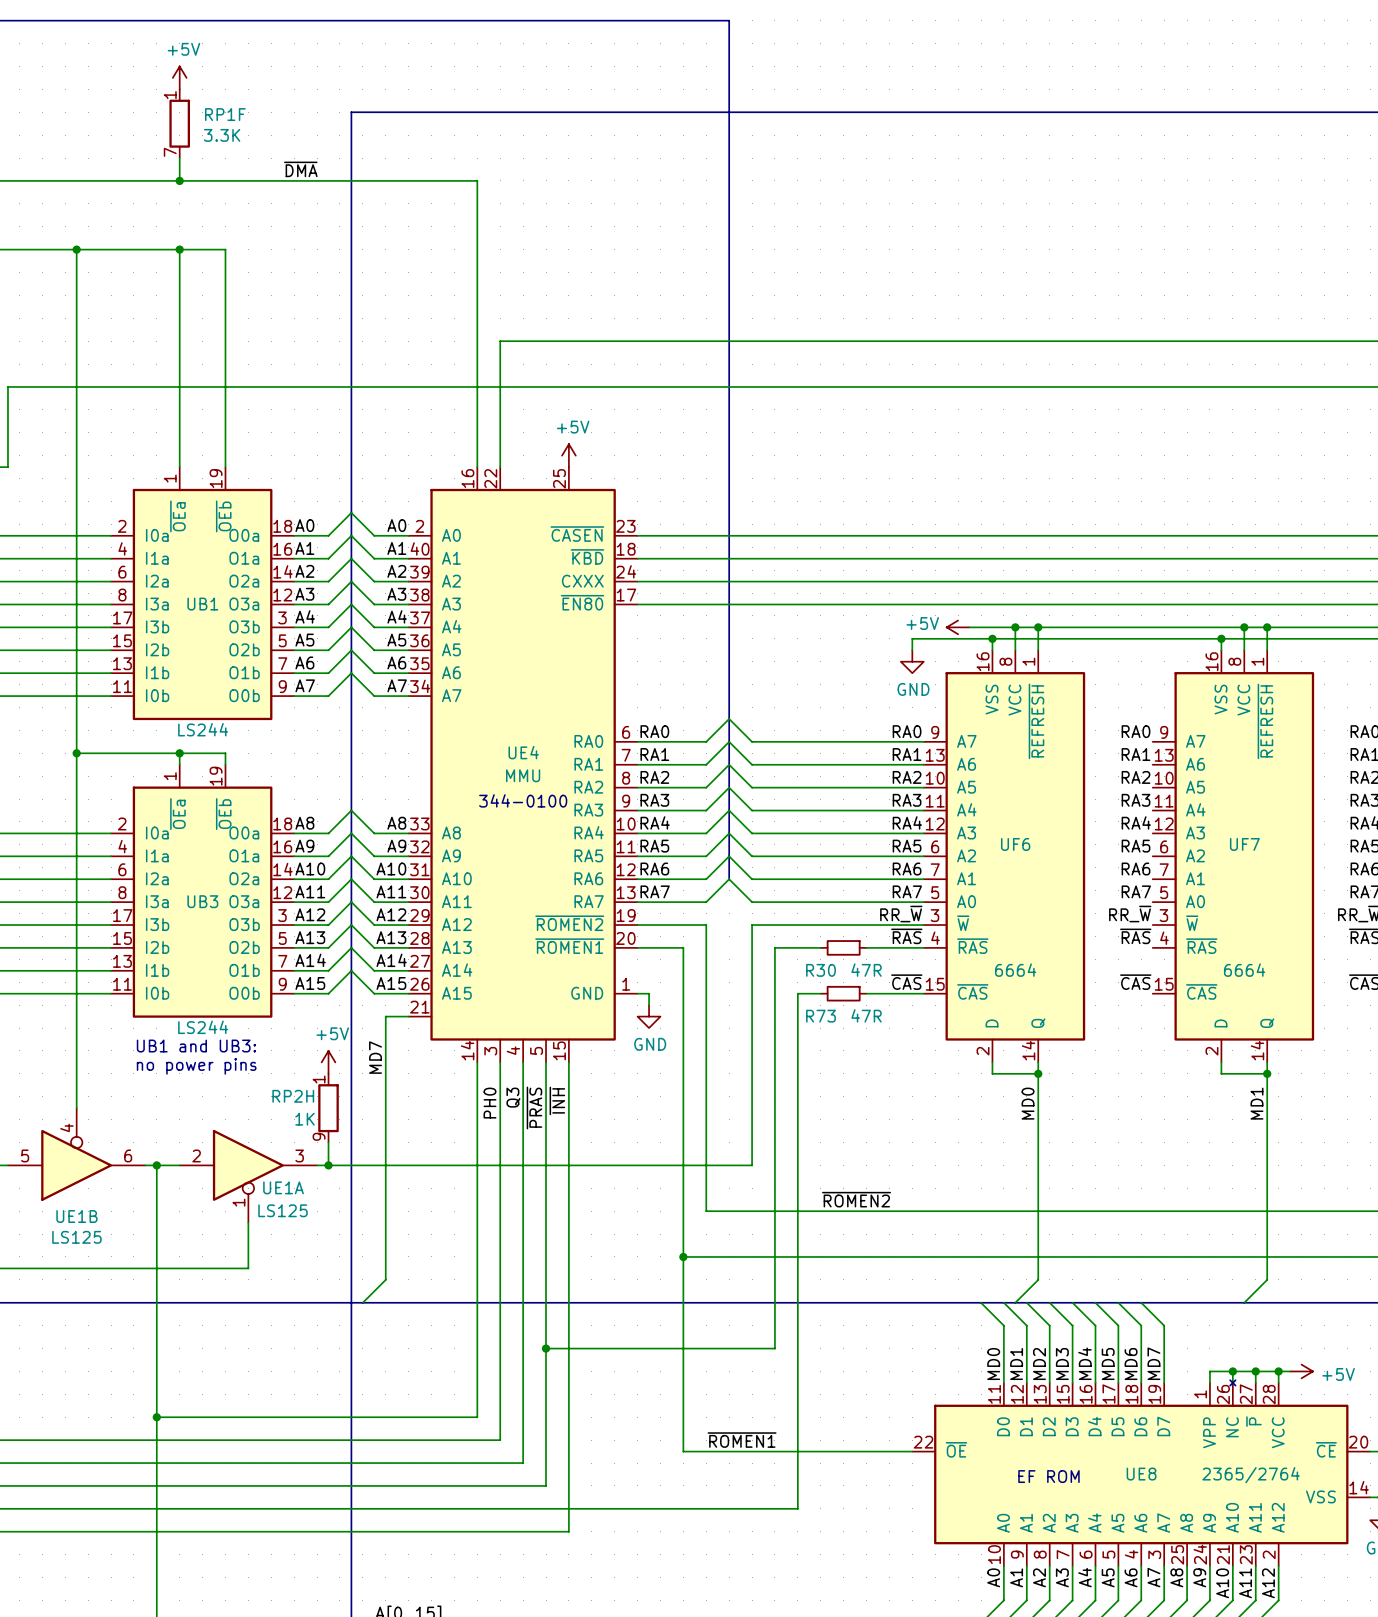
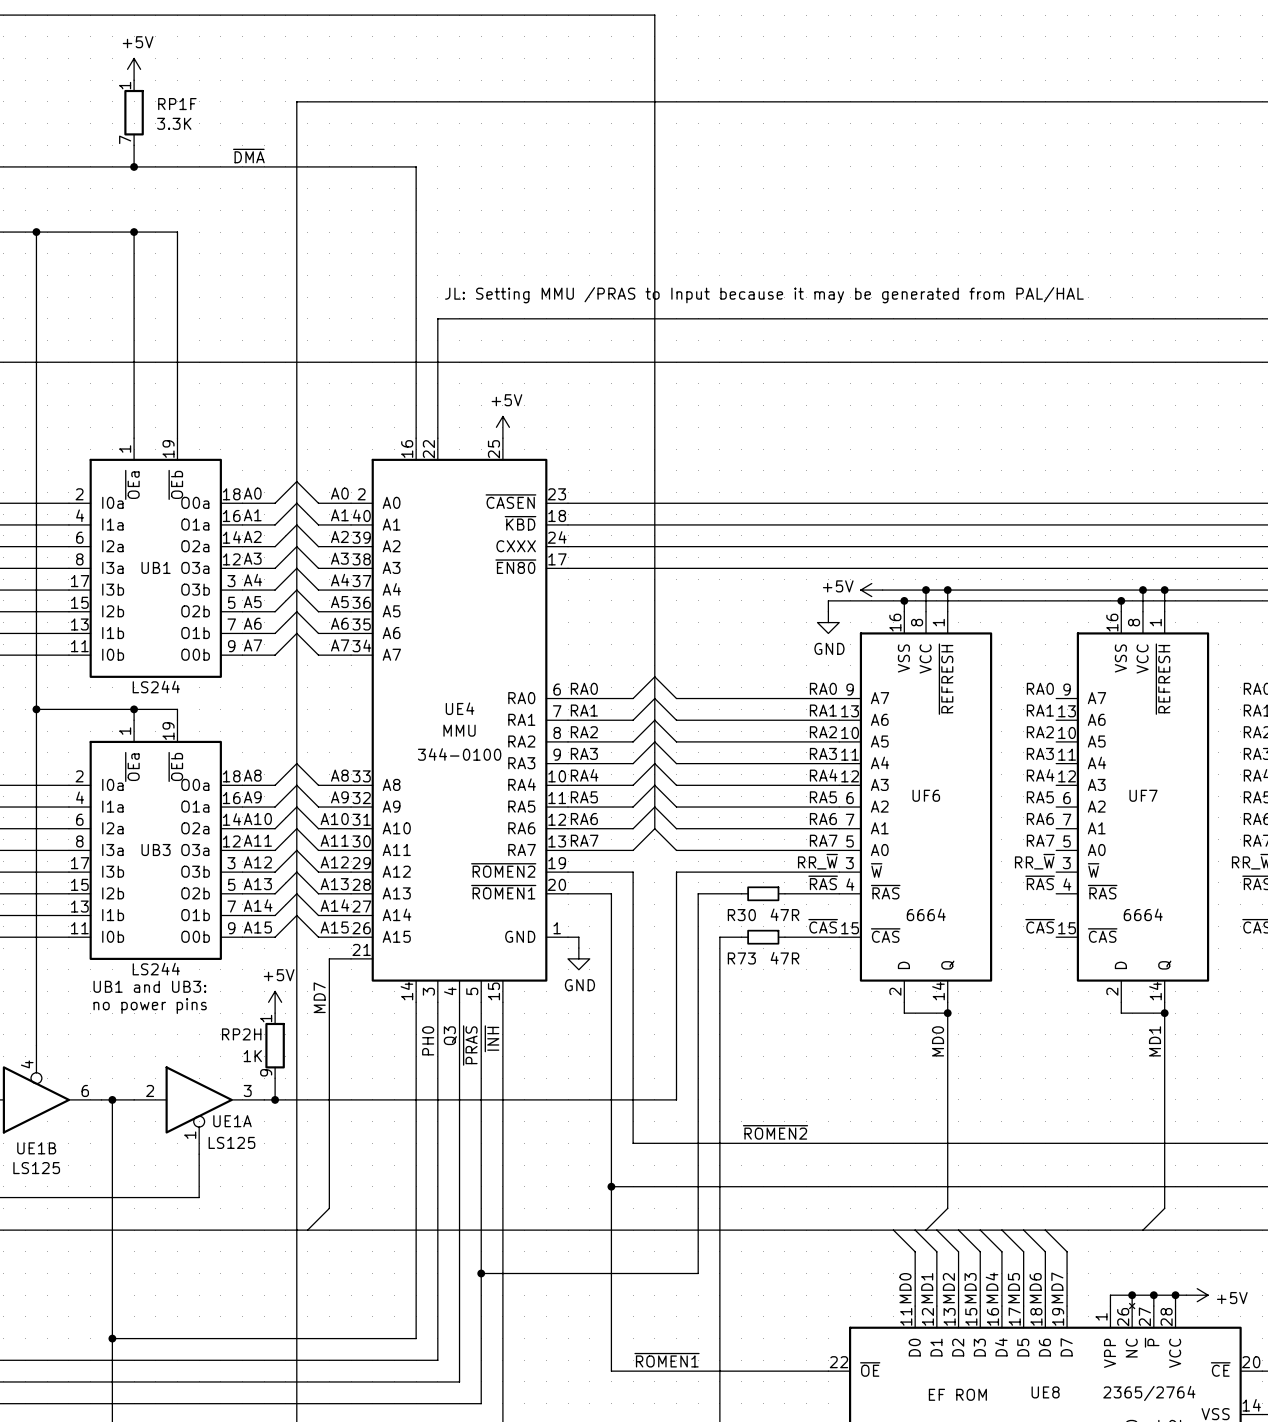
text: none -> JL: Setting MMU /PRAS to Input because it may be generated from PAL/HAL (764, 295)

